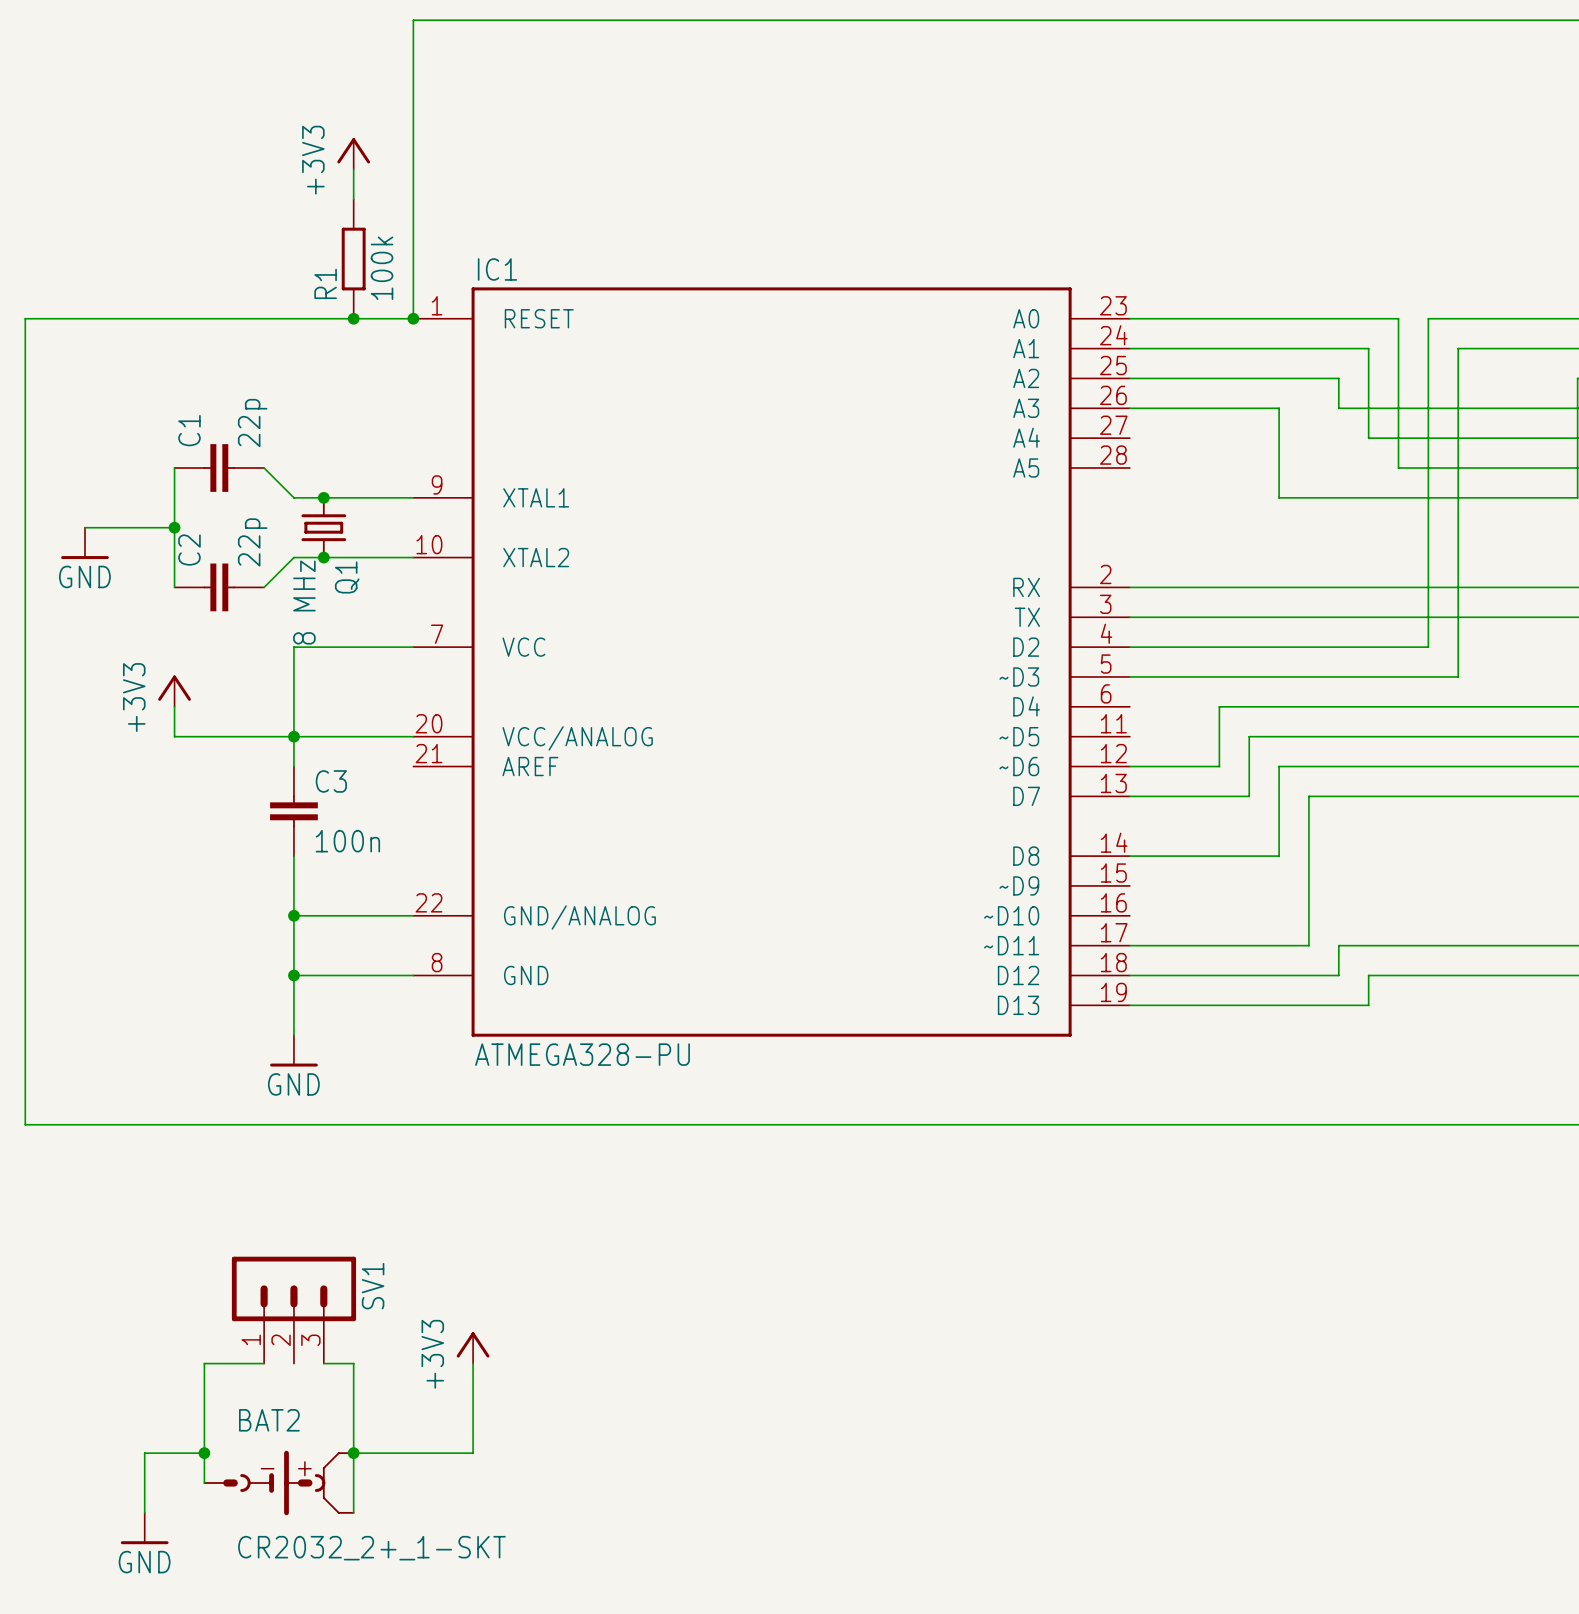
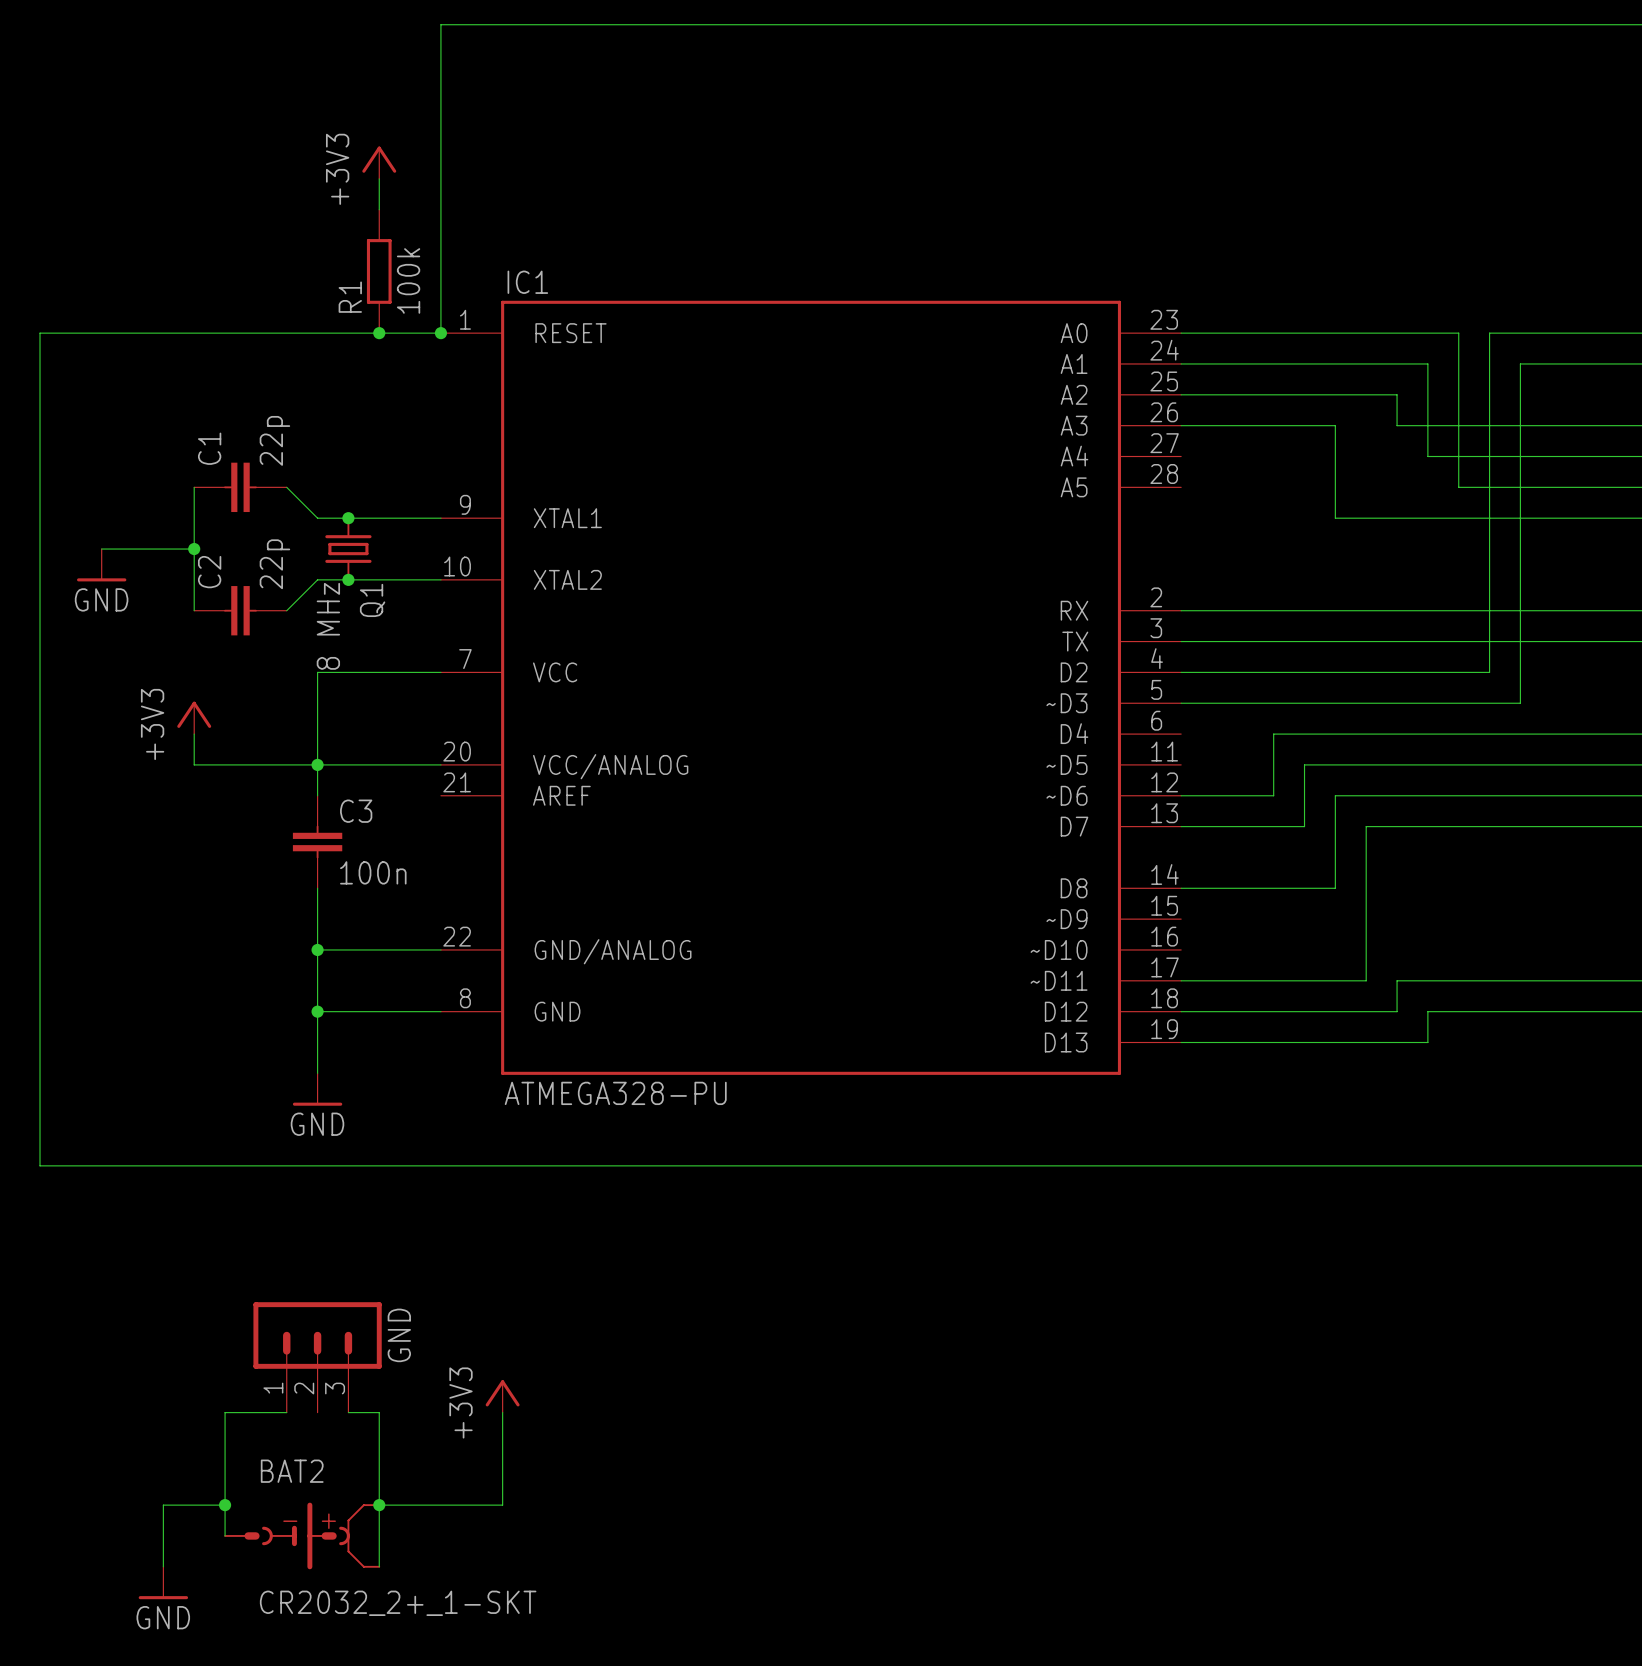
SV1 name: SV1 (373, 1286) -> GND (399, 1335)

